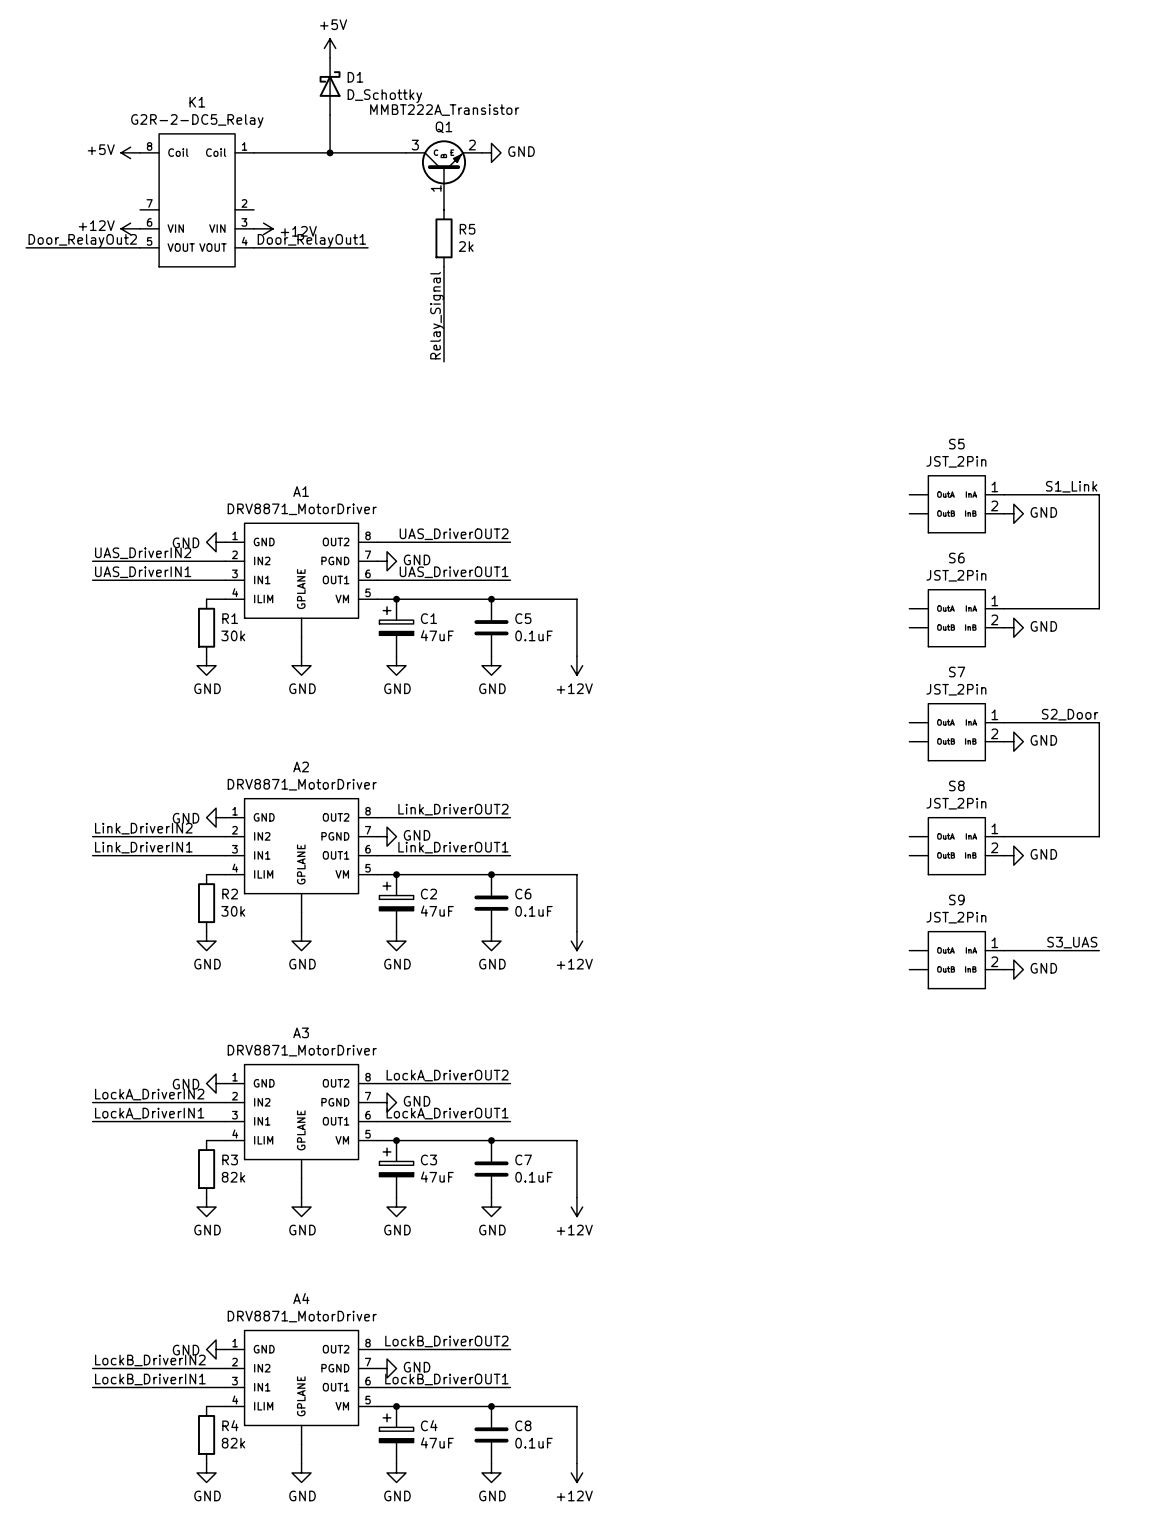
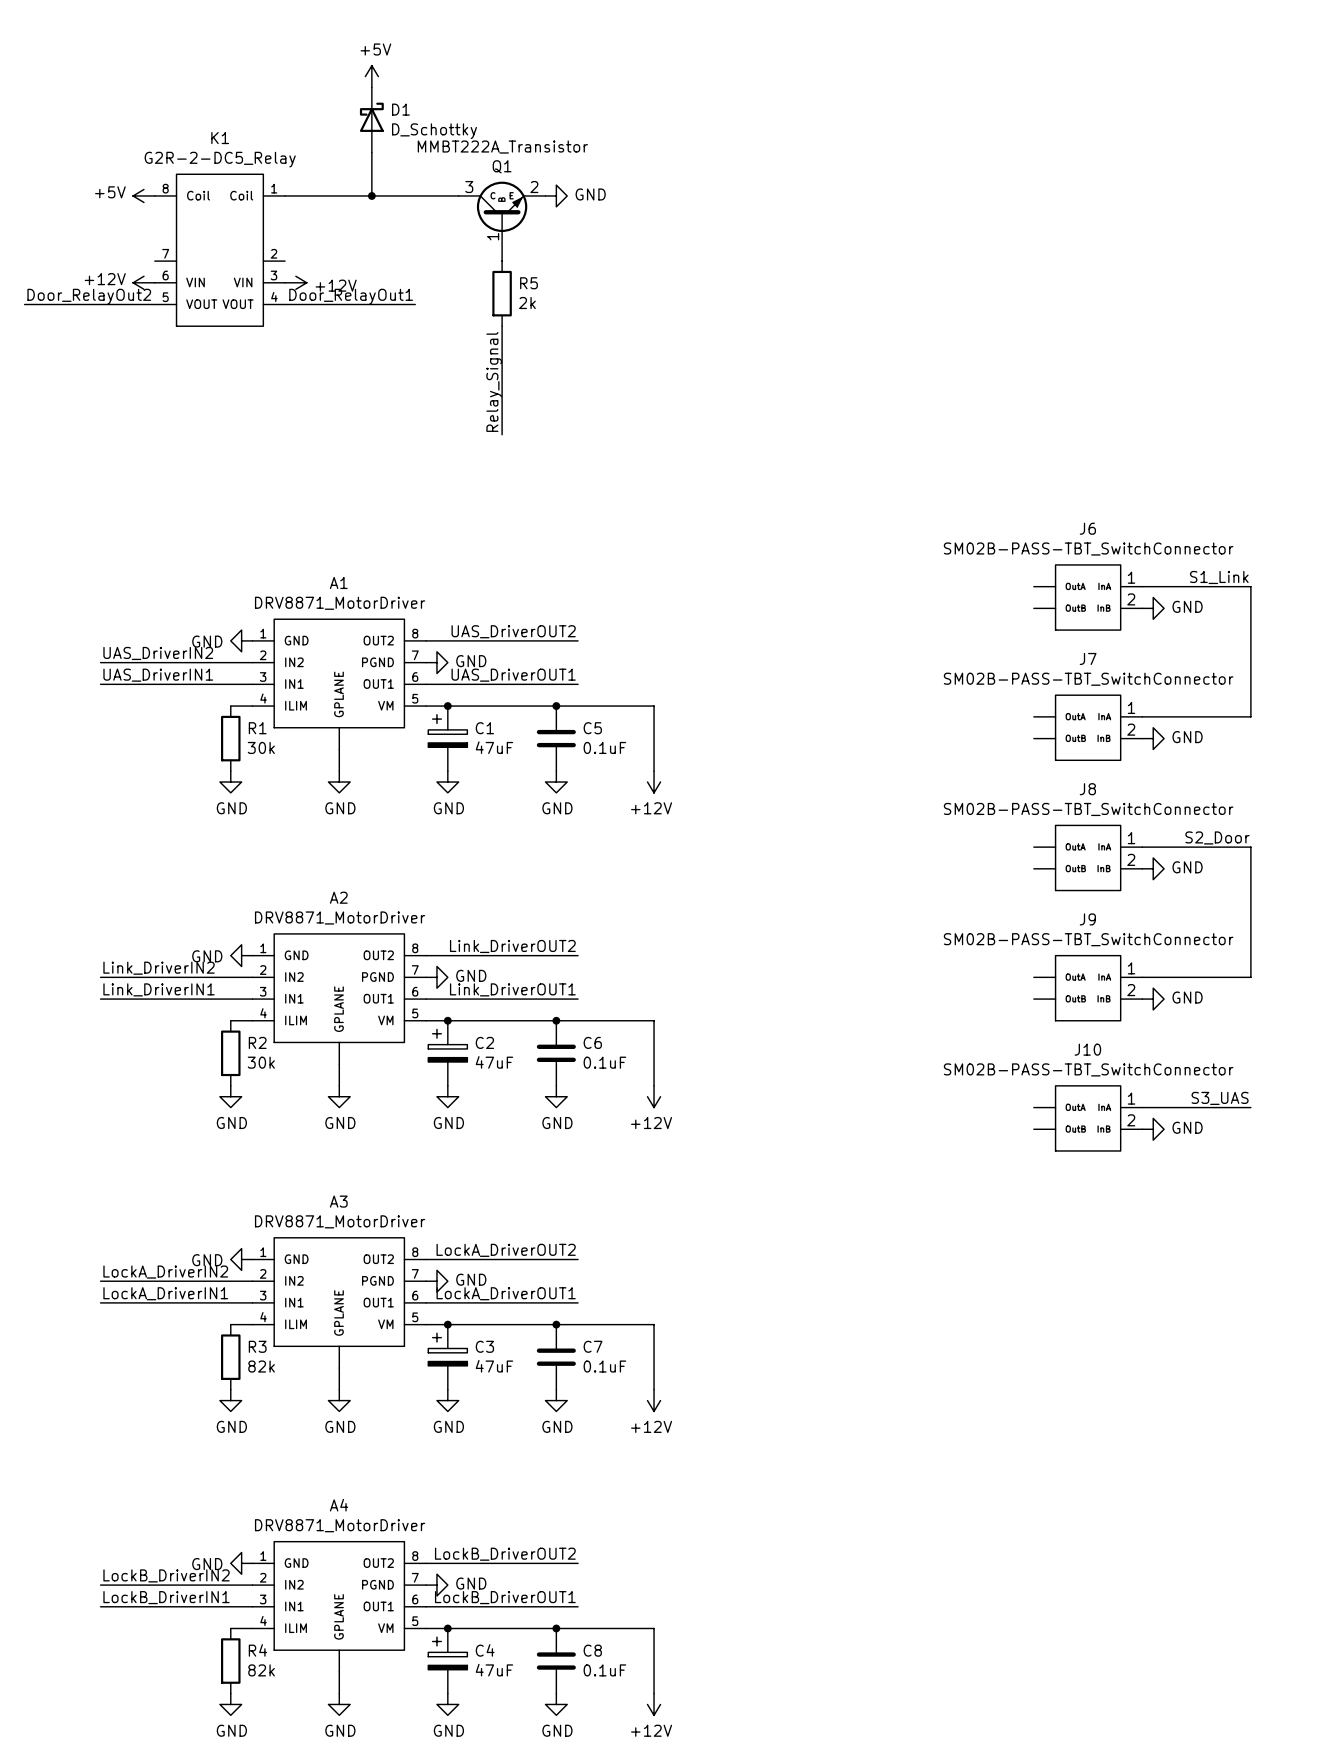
S5 name: S5 (956, 444) -> J6 (1087, 528)
S5 value: JST_2Pin (956, 461) -> SM02B-PASS-TBT_SwitchConnector (1088, 549)
S6 name: S6 (956, 558) -> J7 (1088, 658)
S6 value: JST_2Pin (956, 575) -> SM02B-PASS-TBT_SwitchConnector (1088, 679)
S7 name: S7 (957, 672) -> J8 (1087, 789)
S7 value: JST_2Pin (956, 689) -> SM02B-PASS-TBT_SwitchConnector (1088, 809)
S8 name: S8 (956, 785) -> J9 (1087, 919)
S8 value: JST_2Pin (956, 803) -> SM02B-PASS-TBT_SwitchConnector (1088, 939)
S9 name: S9 (956, 899) -> J10 (1087, 1049)
S9 value: JST_2Pin (956, 917) -> SM02B-PASS-TBT_SwitchConnector (1088, 1069)

